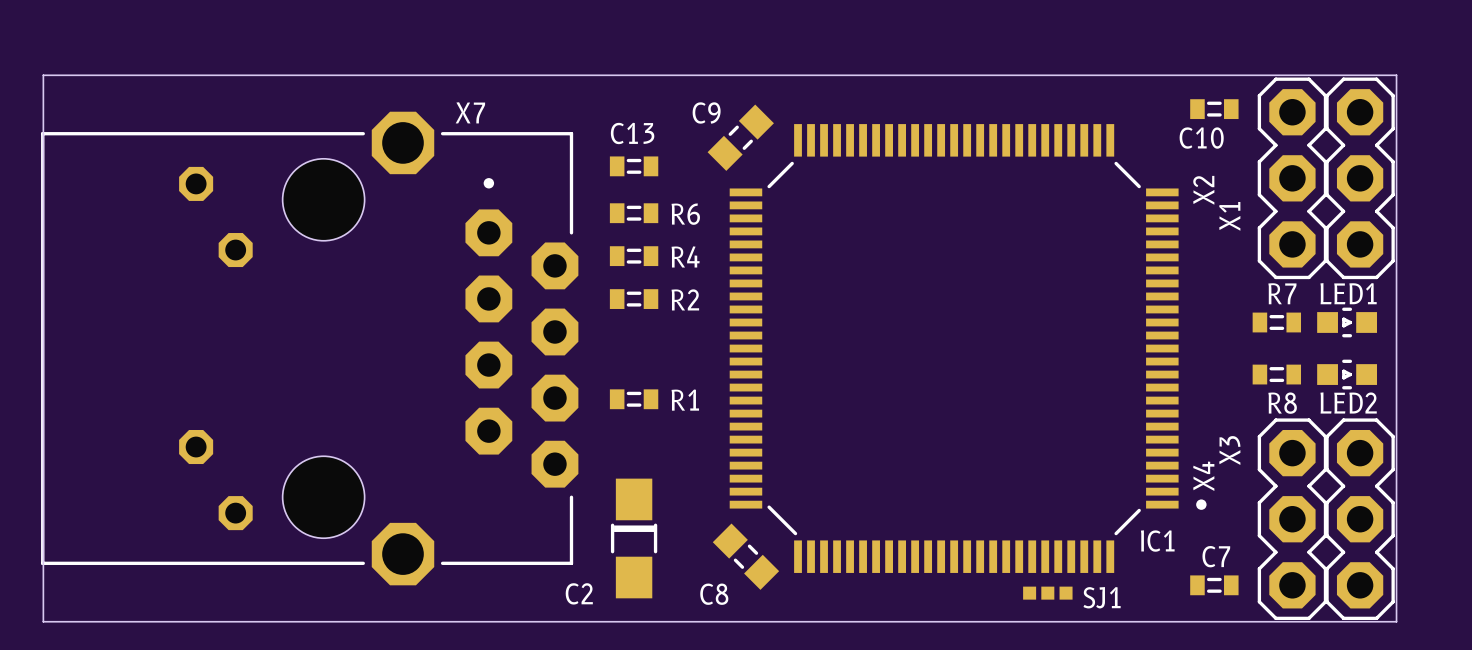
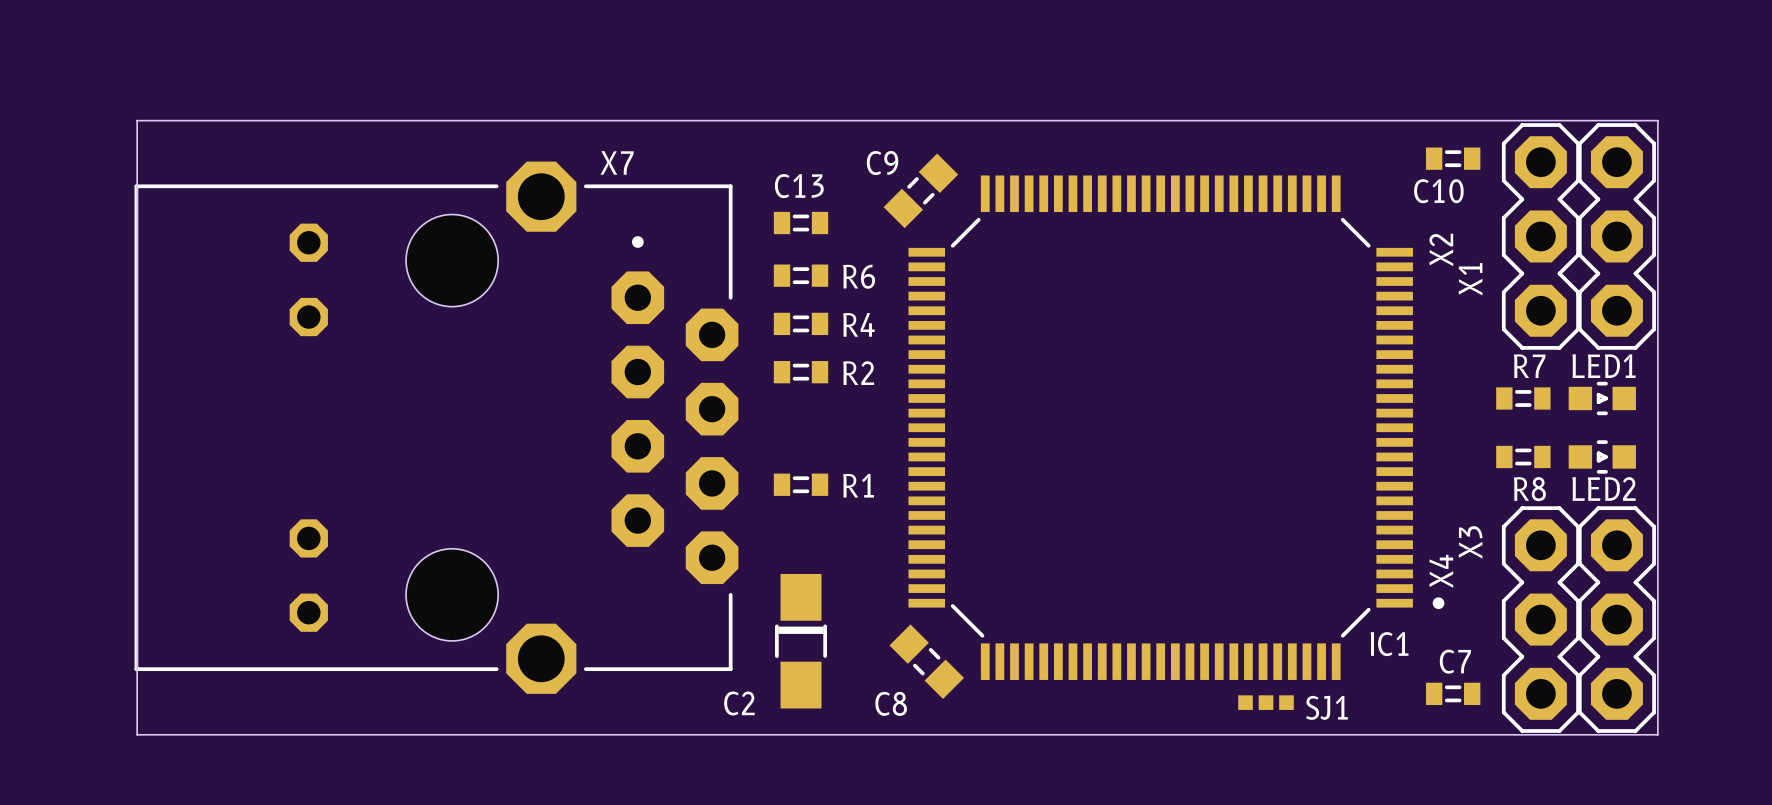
X7 footprint: [41, 111, 579, 586] -> [134, 161, 739, 694]

